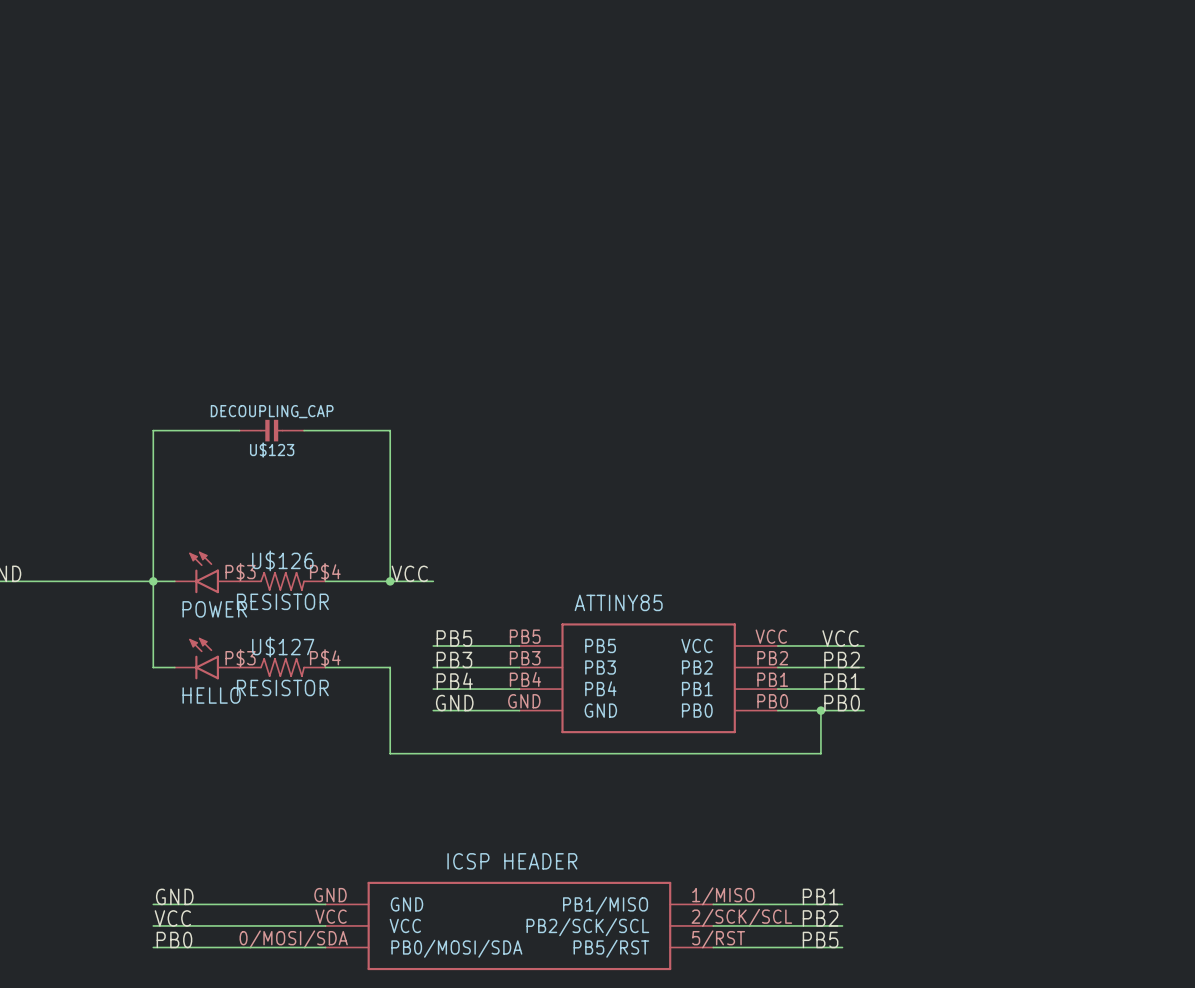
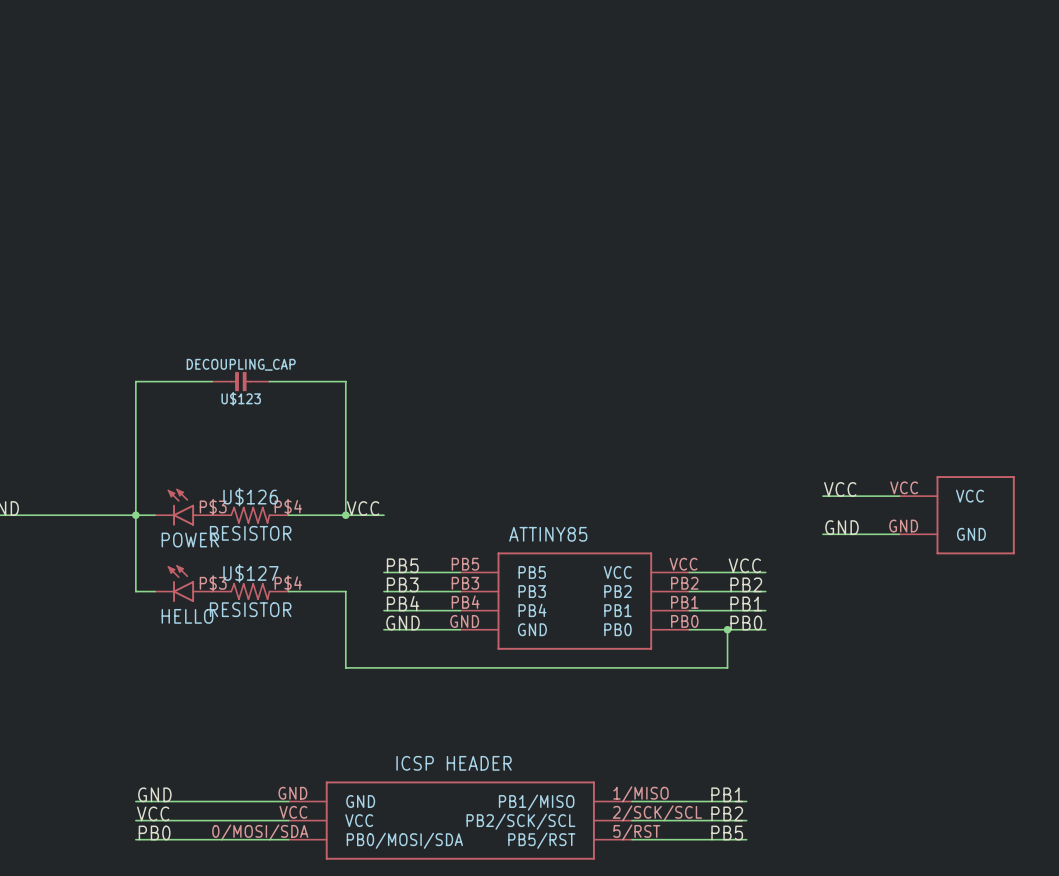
label: none -> VCC (840, 489)
wire: none -> (822, 496) (899, 496)
part: none -> (957, 515)
label: none -> GND (841, 527)
wire: none -> (822, 534) (899, 534)

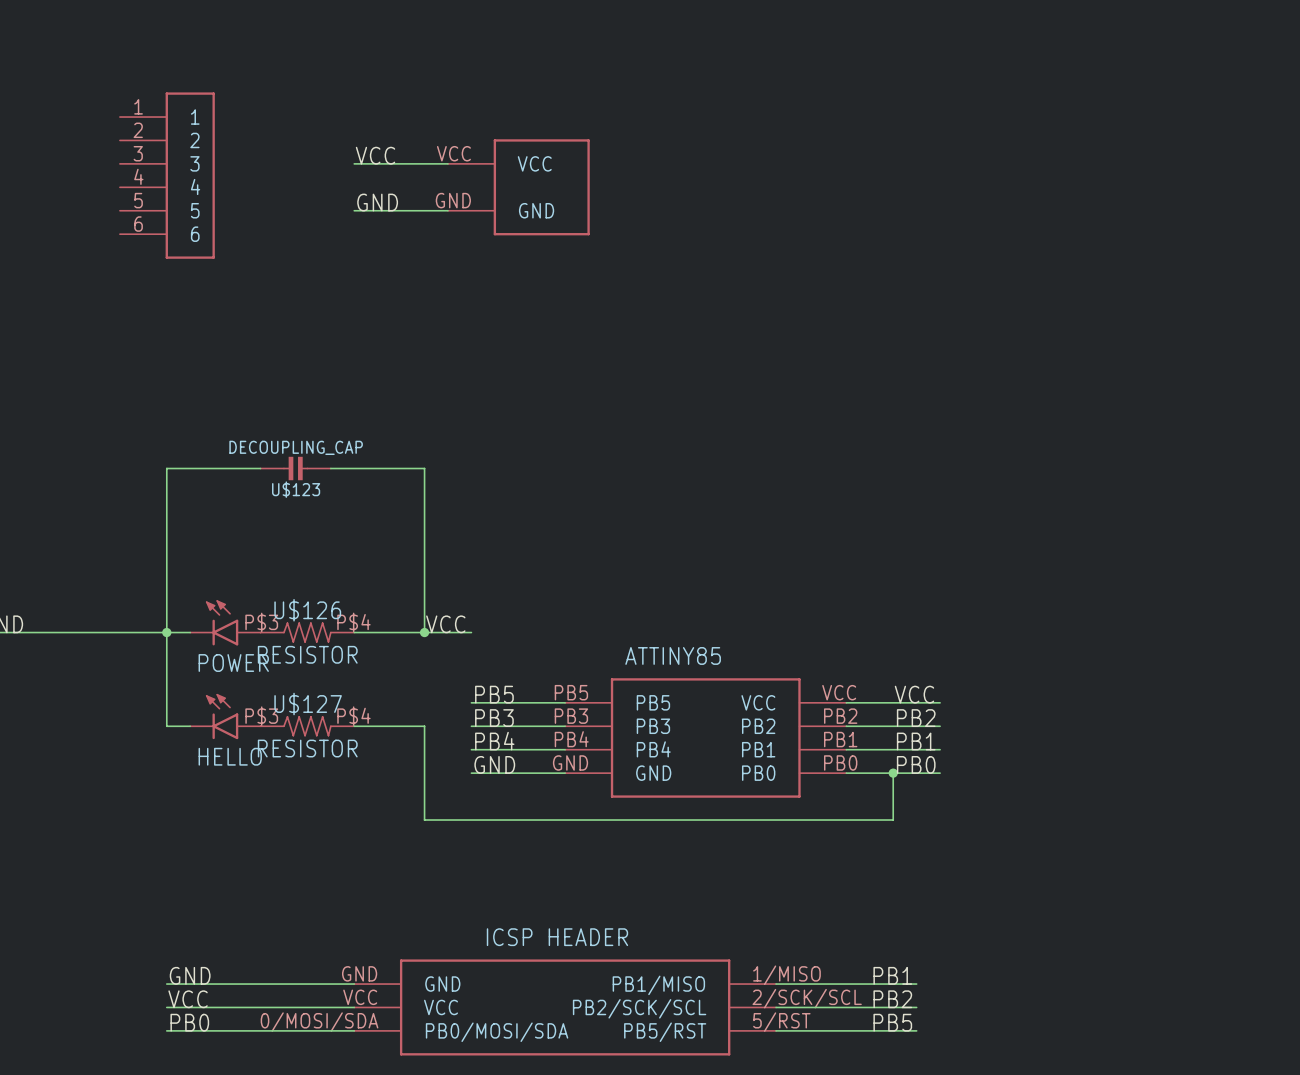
label: none -> VCC (375, 155)
wire: none -> (354, 163) (447, 163)
part: none -> (167, 175)
part: none -> (518, 187)
label: none -> GND (377, 202)
wire: none -> (354, 210) (447, 210)
label: VCC (840, 489) -> none
wire: (822, 496) (899, 496) -> none
part: (957, 515) -> none
label: GND (841, 527) -> none
wire: (822, 534) (899, 534) -> none

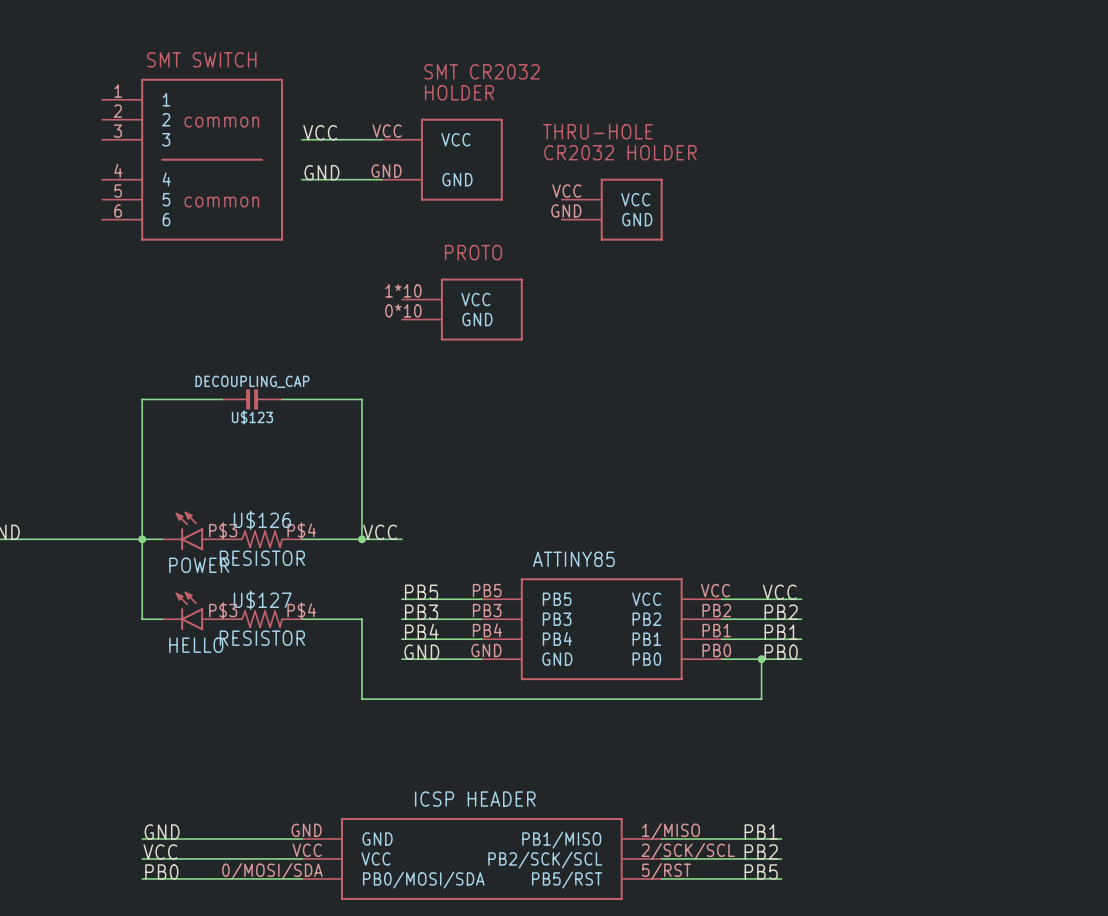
part text: none -> SMT CR2032 (481, 71)
part text: none -> HOLDER (459, 92)
part: (167, 175) -> none
part: none -> (192, 159)
part: none -> (612, 209)
part: none -> (462, 309)

